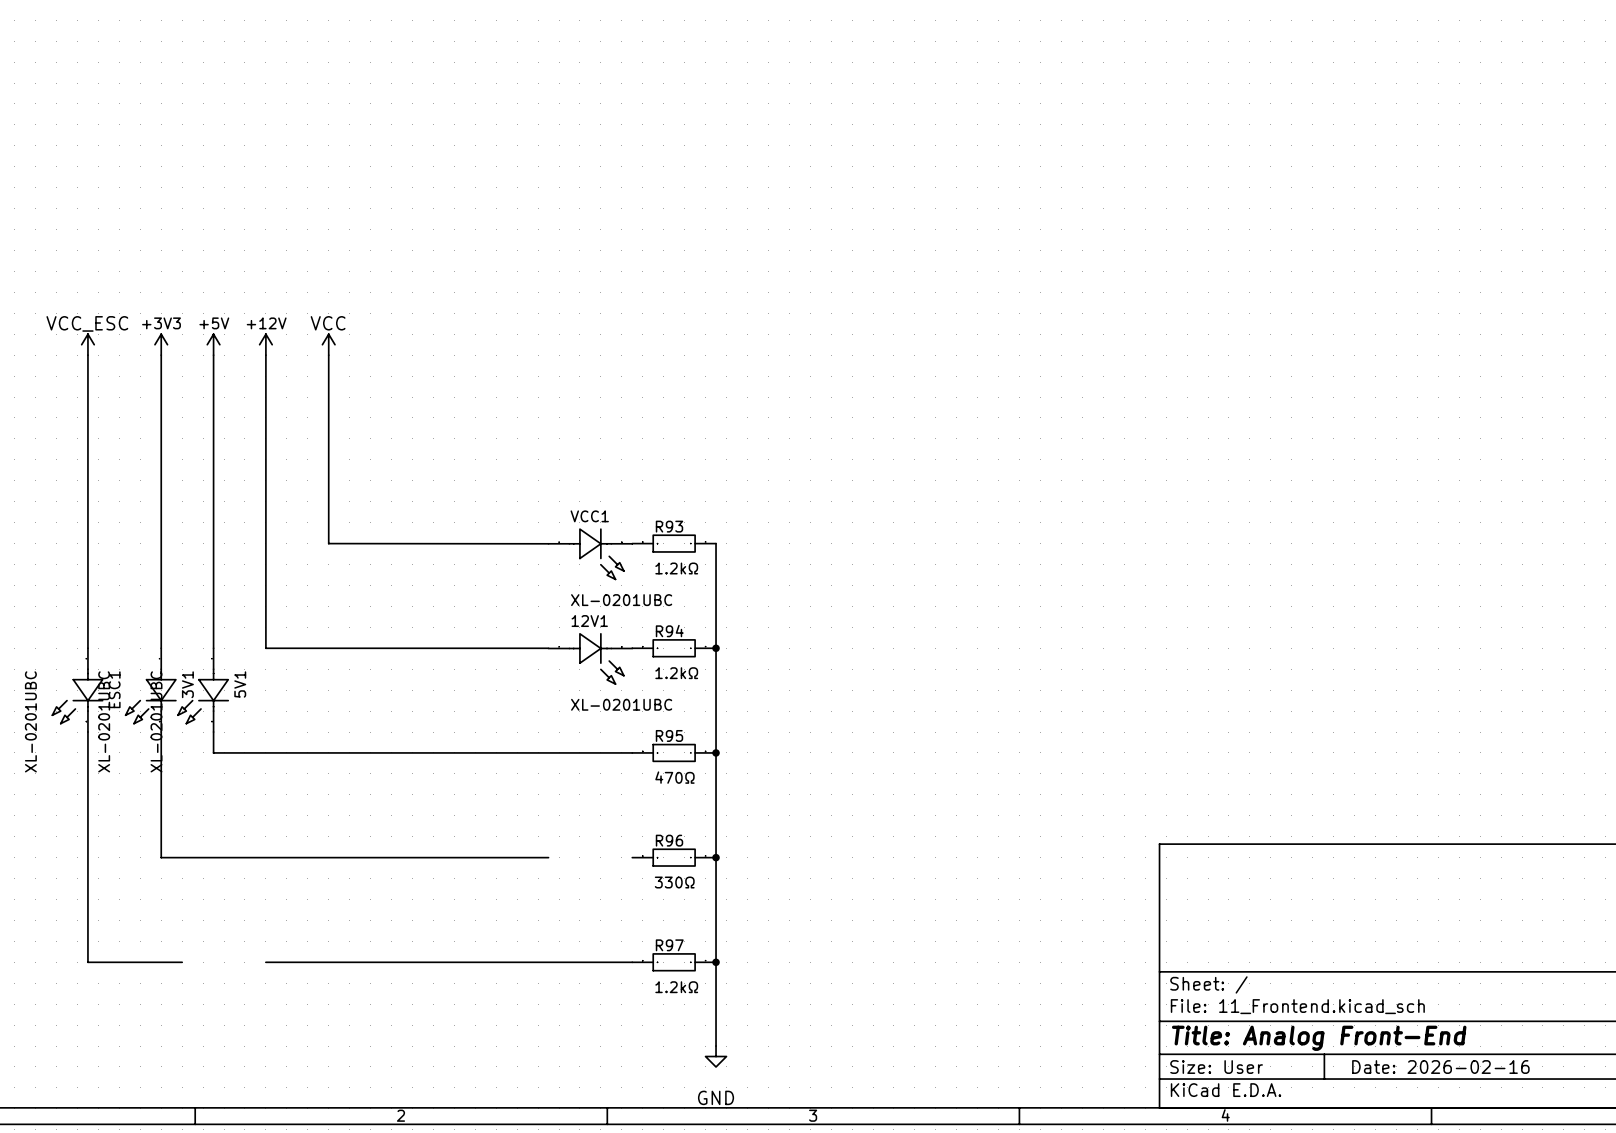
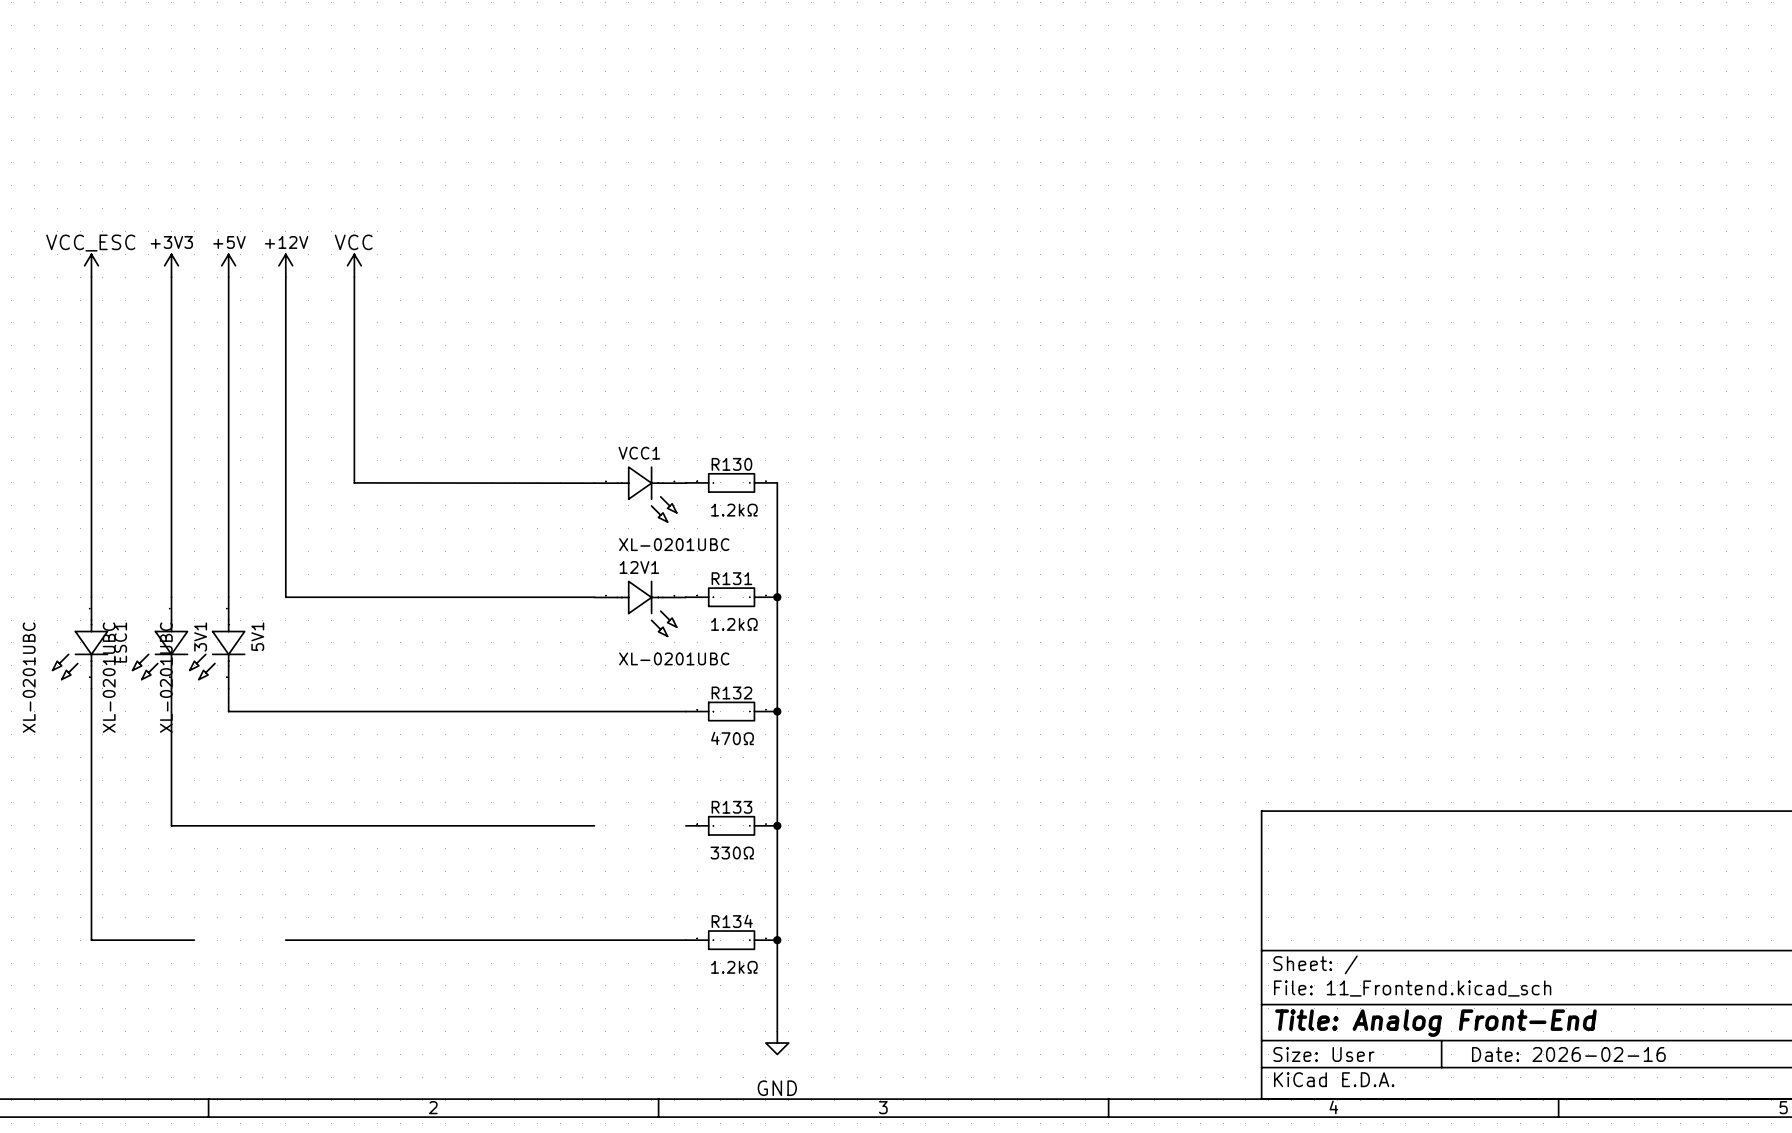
R93 name: R93 (669, 526) -> R130 (731, 464)
R94 name: R94 (669, 631) -> R131 (731, 578)
R95 name: R95 (669, 735) -> R132 (731, 692)
R96 name: R96 (669, 840) -> R133 (731, 807)
R97 name: R97 (669, 945) -> R134 (732, 921)

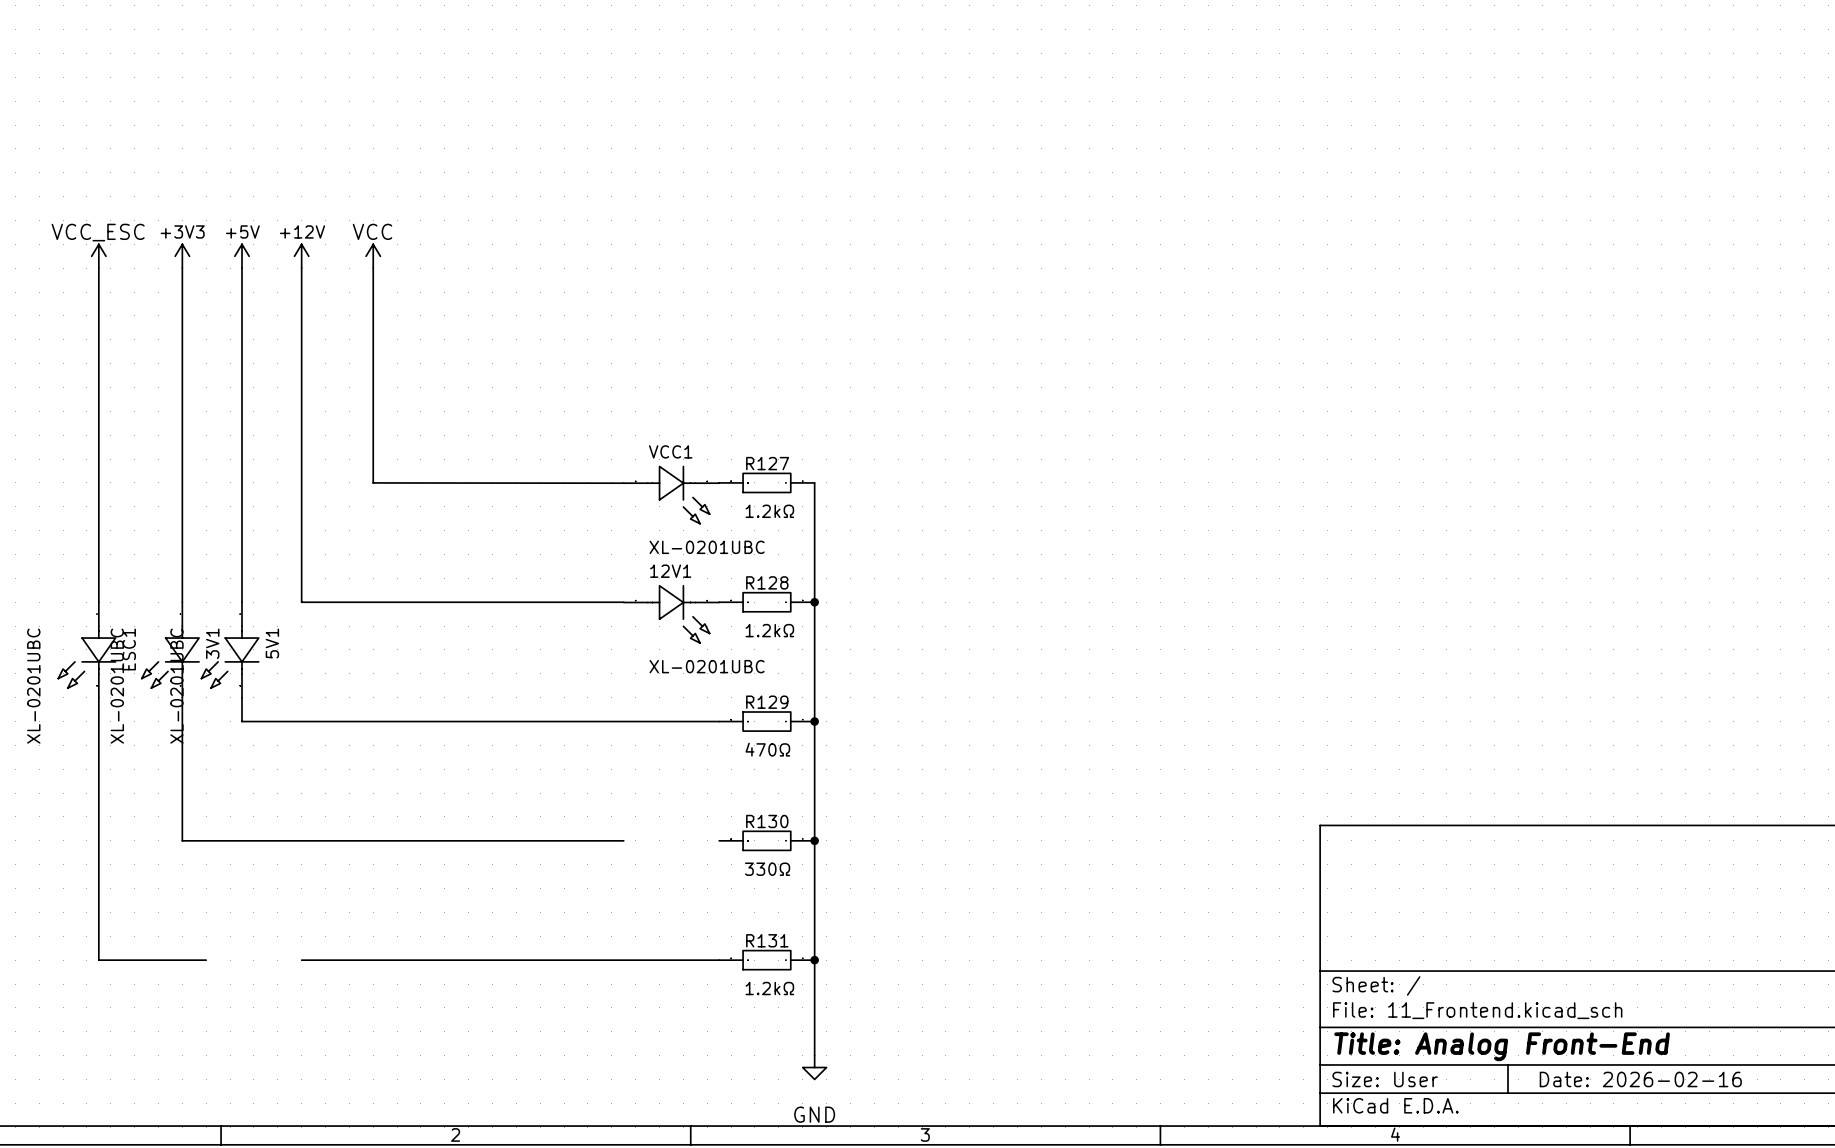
R130 name: R130 (731, 464) -> R127 (767, 463)
R131 name: R131 (731, 578) -> R128 (767, 582)
R132 name: R132 (731, 692) -> R129 (767, 702)
R133 name: R133 (731, 807) -> R130 (767, 821)
R134 name: R134 (732, 921) -> R131 (767, 940)

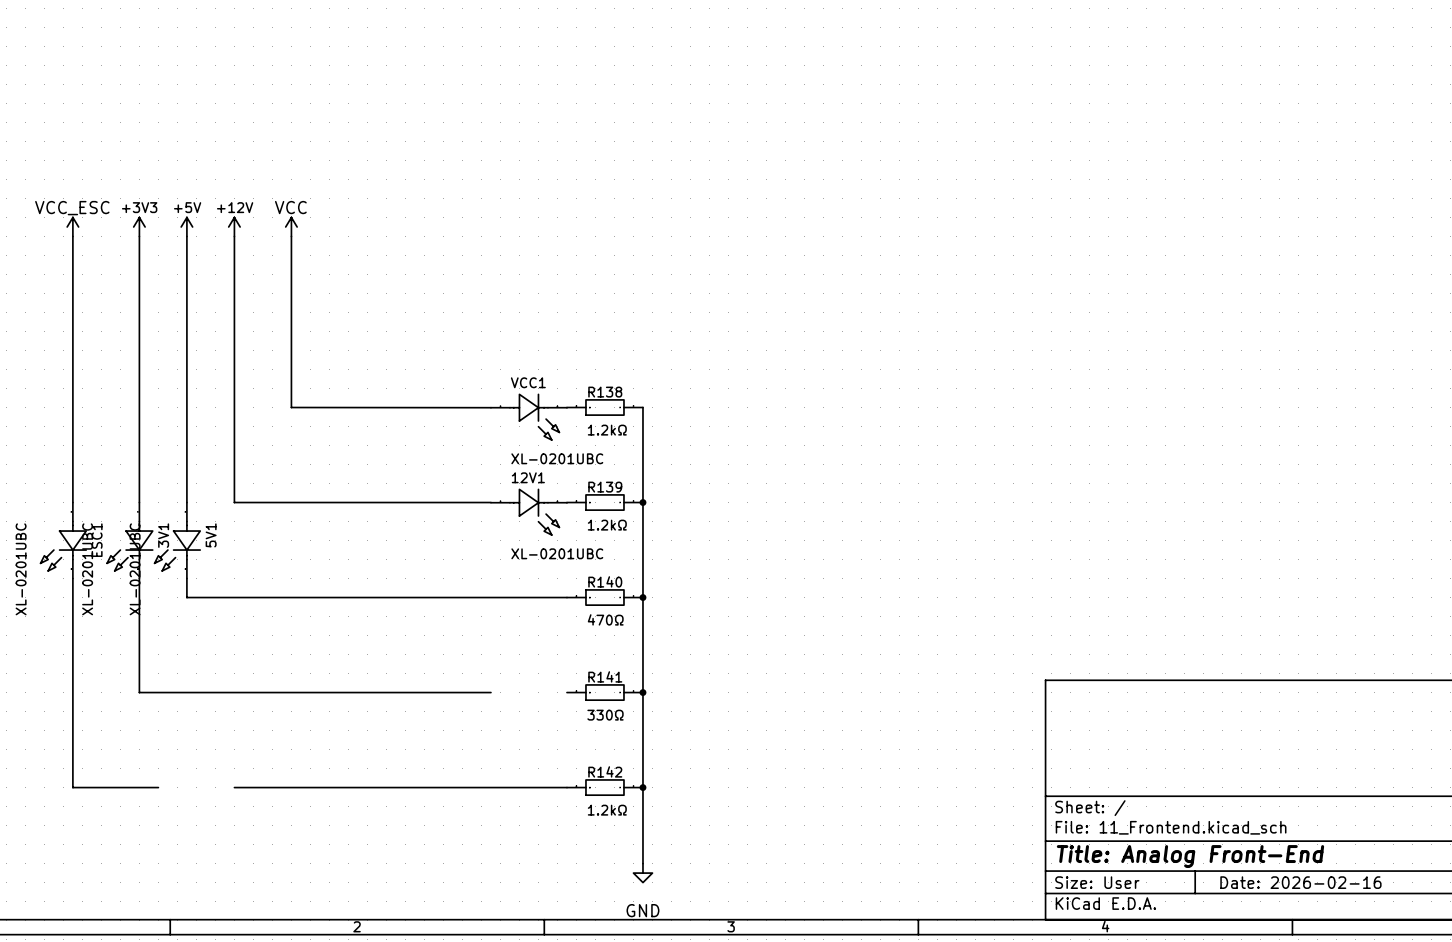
R127 name: R127 (767, 463) -> R138 (605, 392)
R128 name: R128 (767, 582) -> R139 (605, 487)
R129 name: R129 (767, 702) -> R140 (605, 581)
R130 name: R130 (767, 821) -> R141 (605, 676)
R131 name: R131 (767, 940) -> R142 (605, 771)

